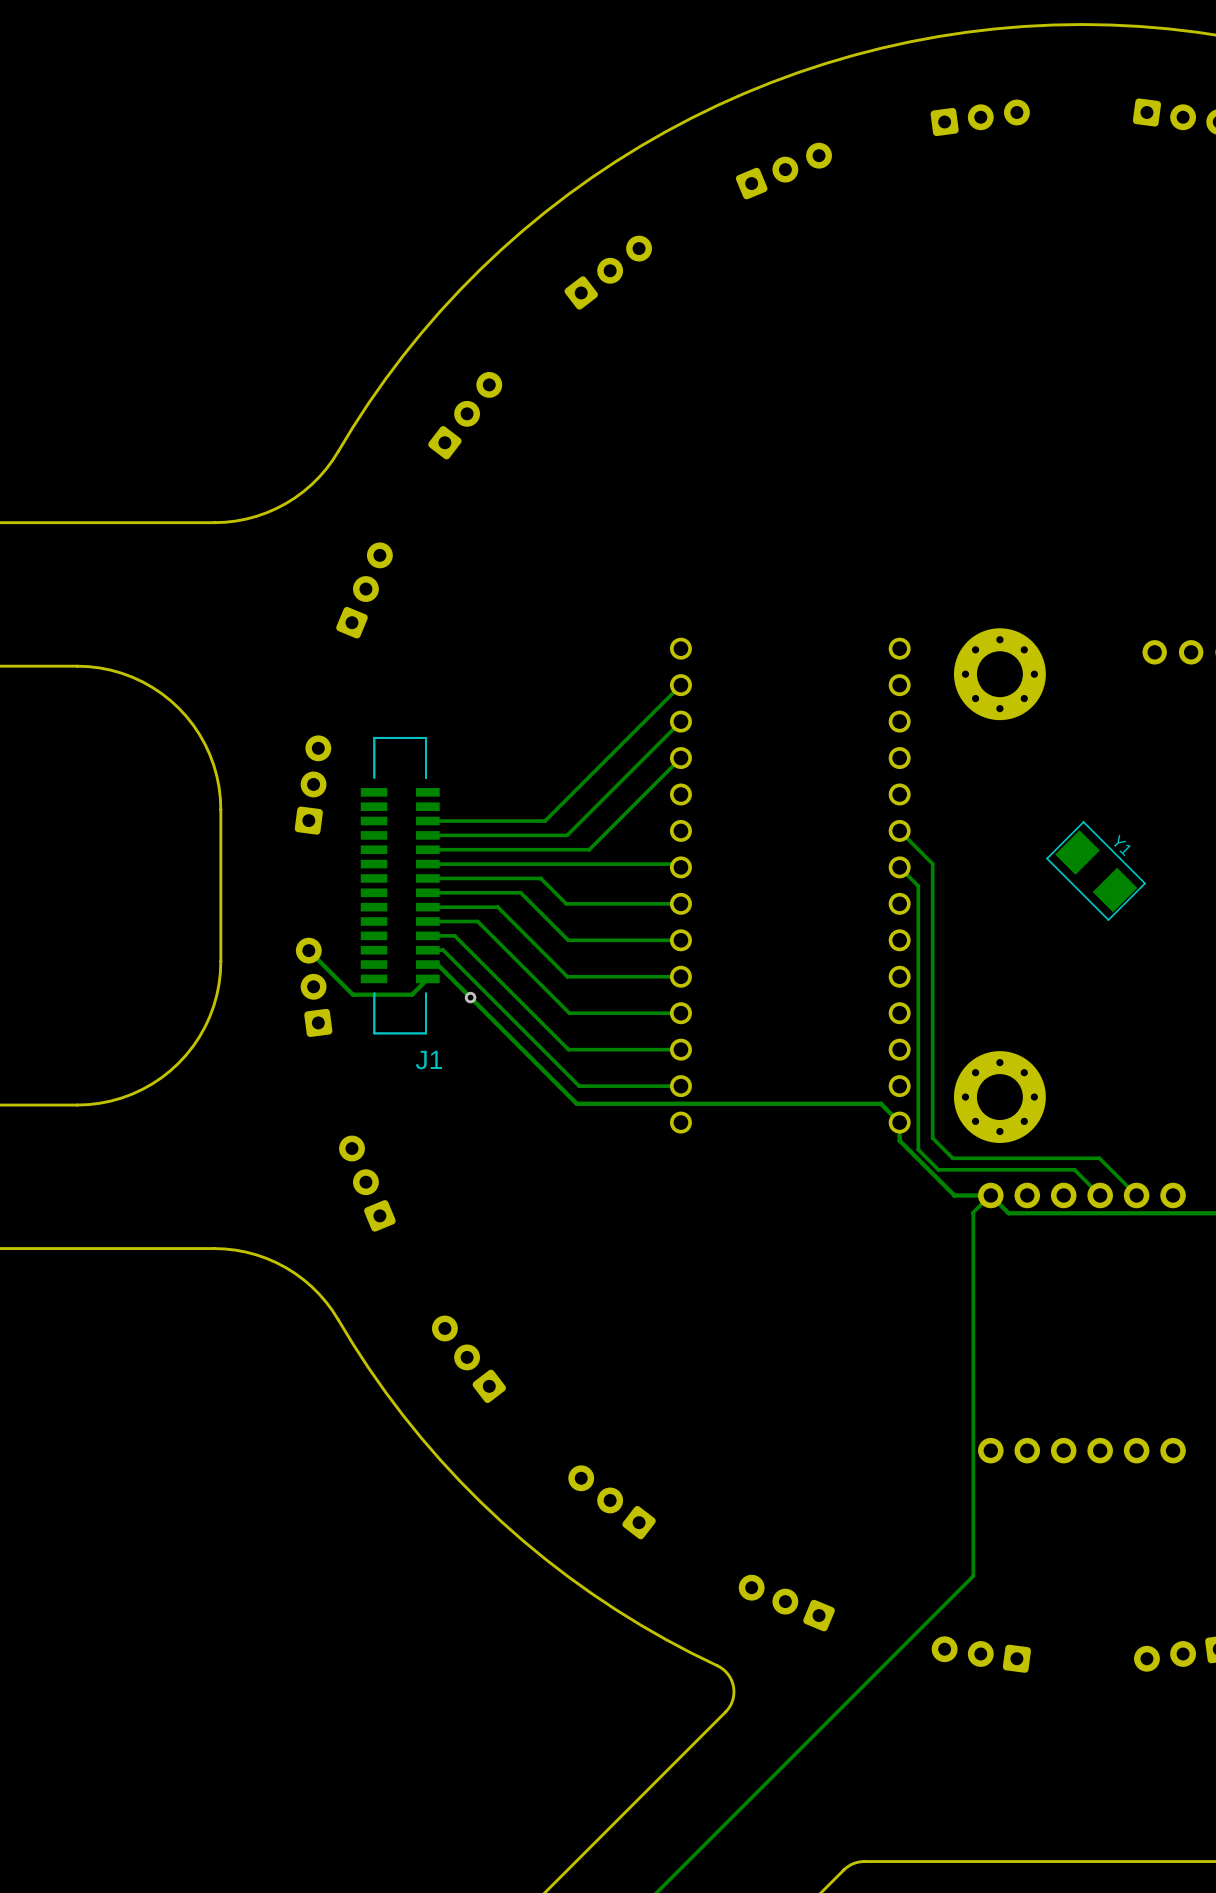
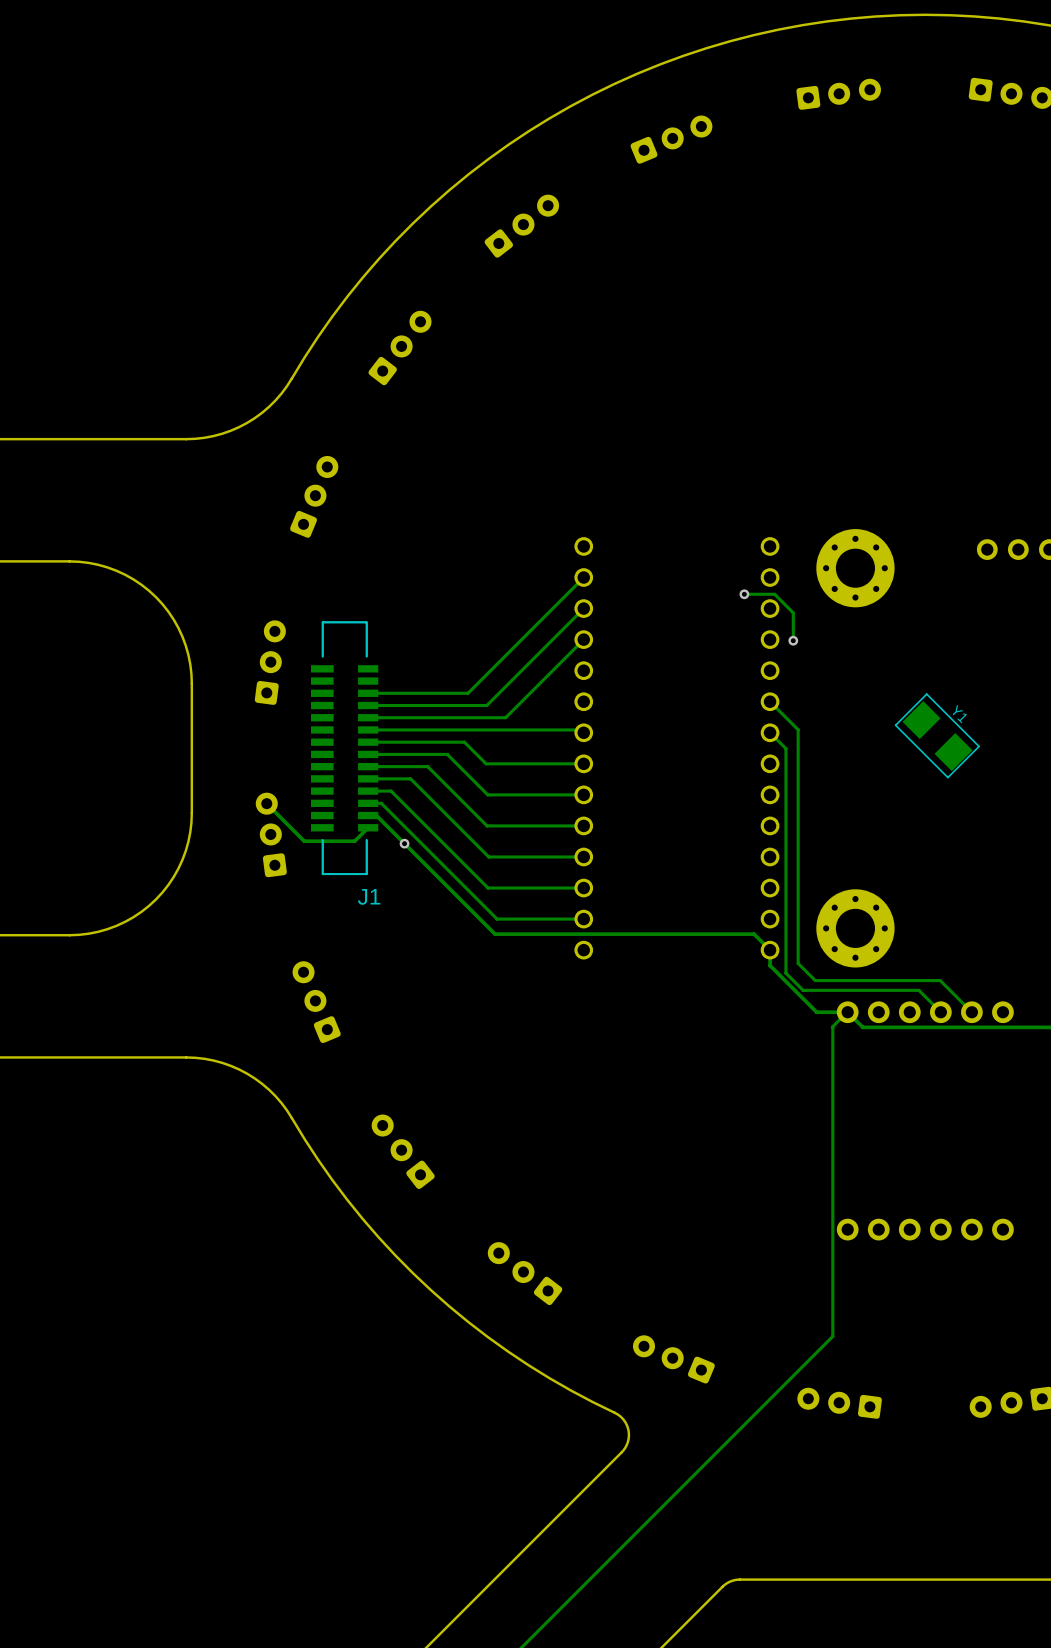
track: none -> (744, 594) (774, 594) (793, 612) (793, 640)
via: none -> (744, 594)
via: none -> (793, 640)

